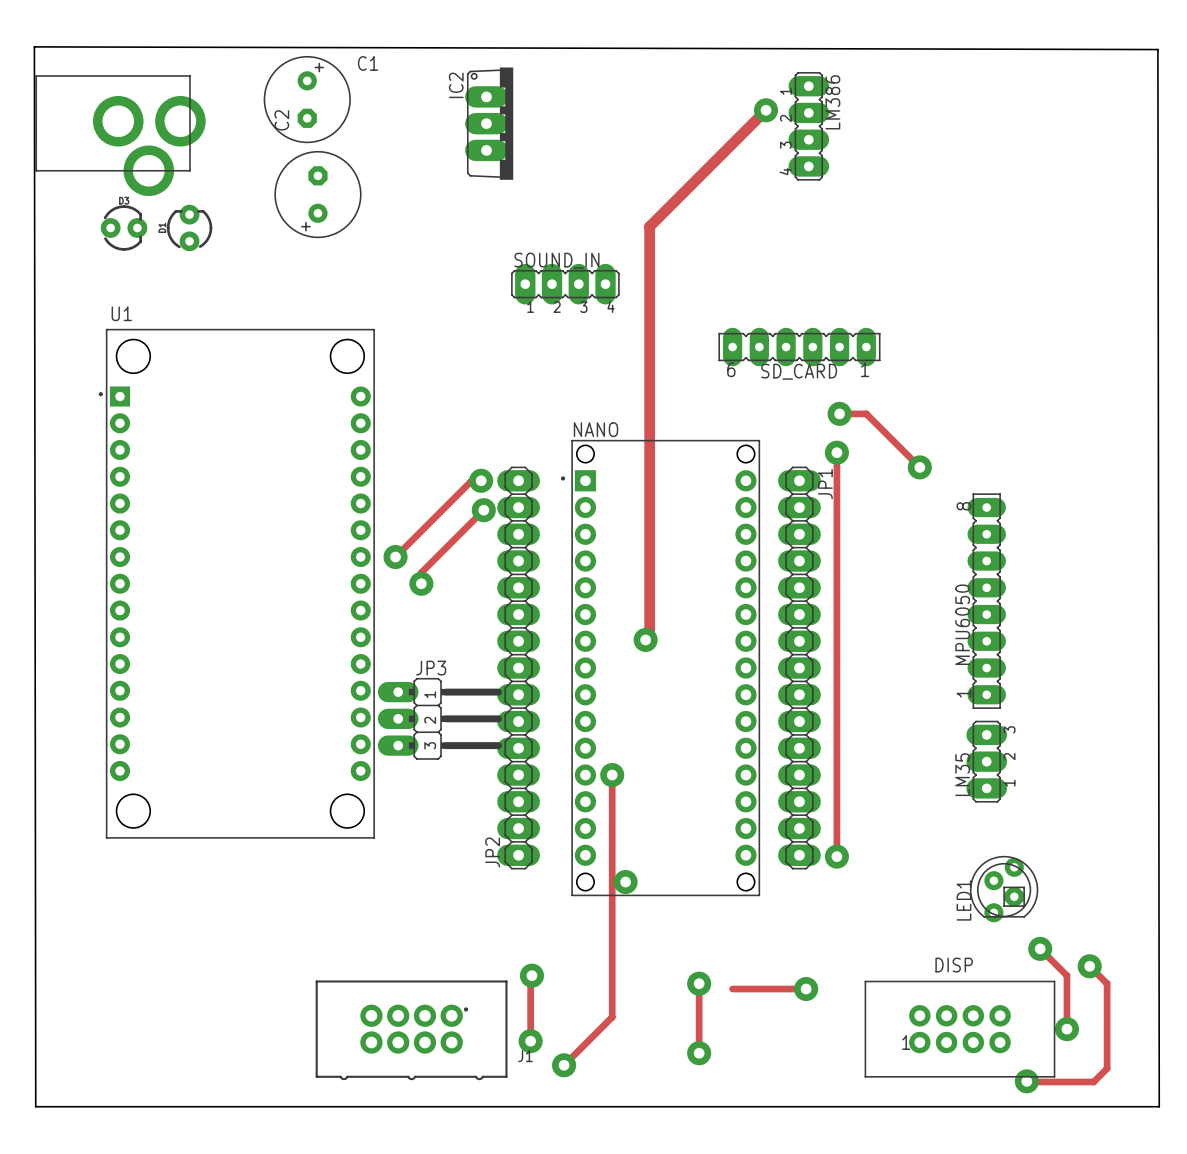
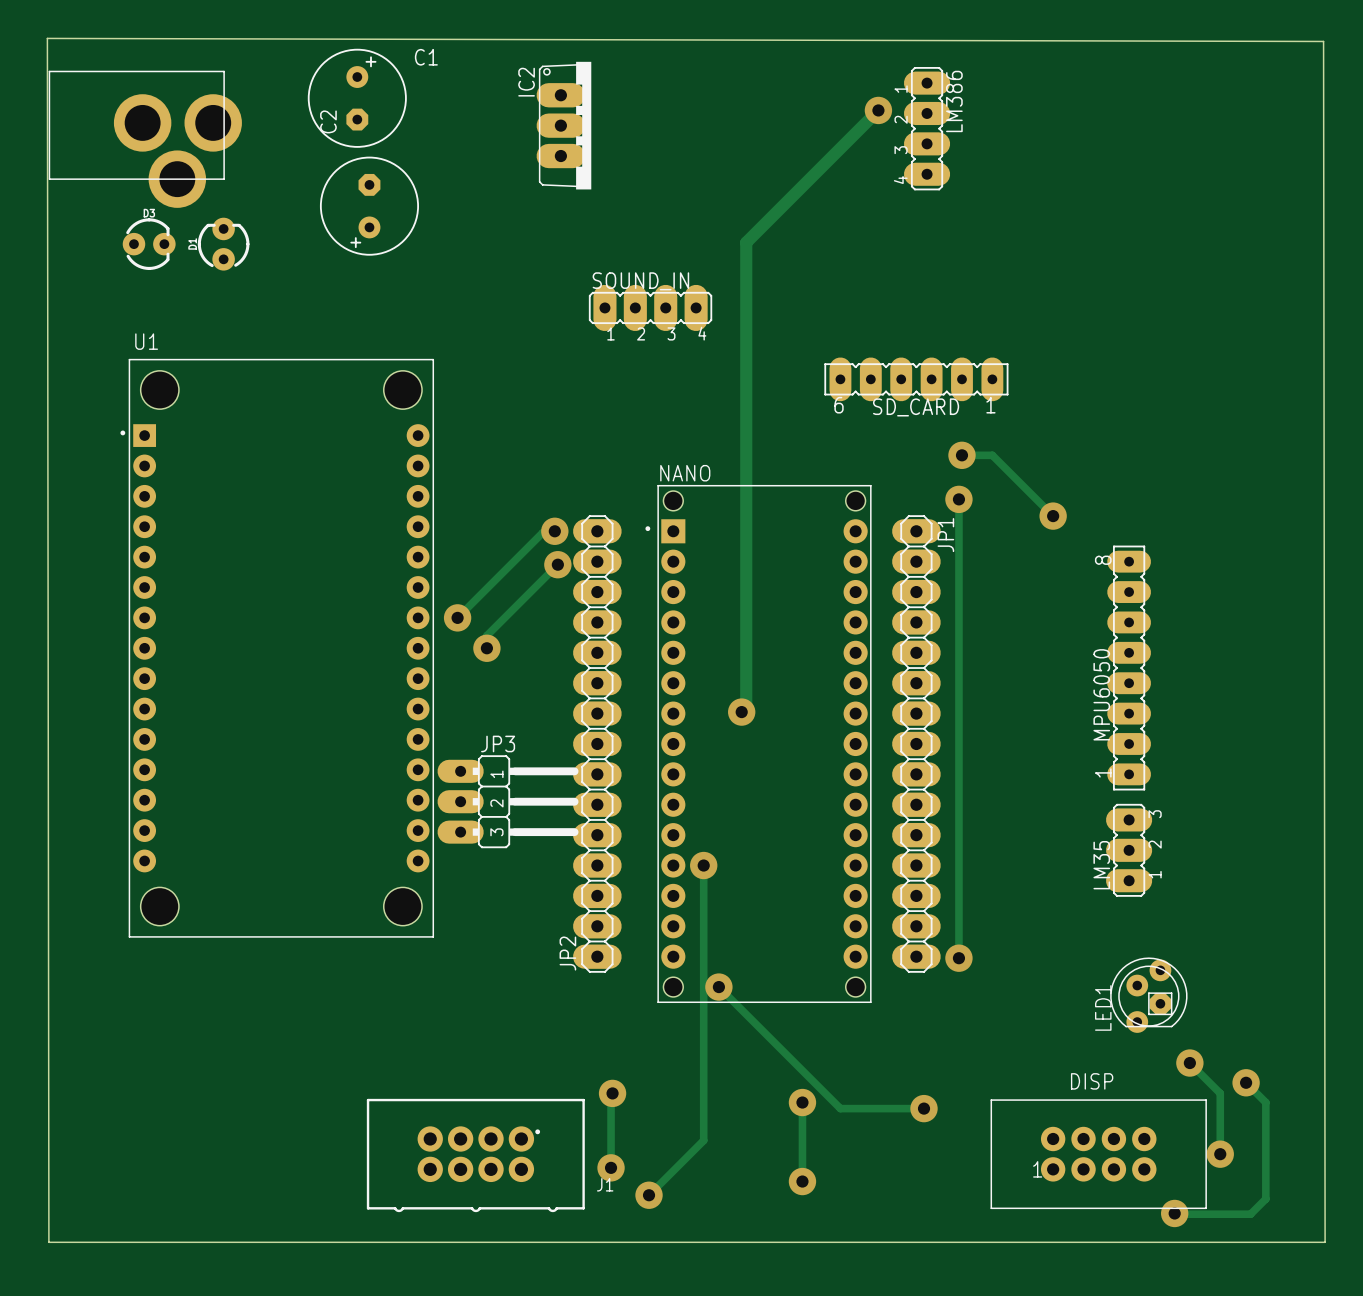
track: none -> (718, 987) (840, 1108)

